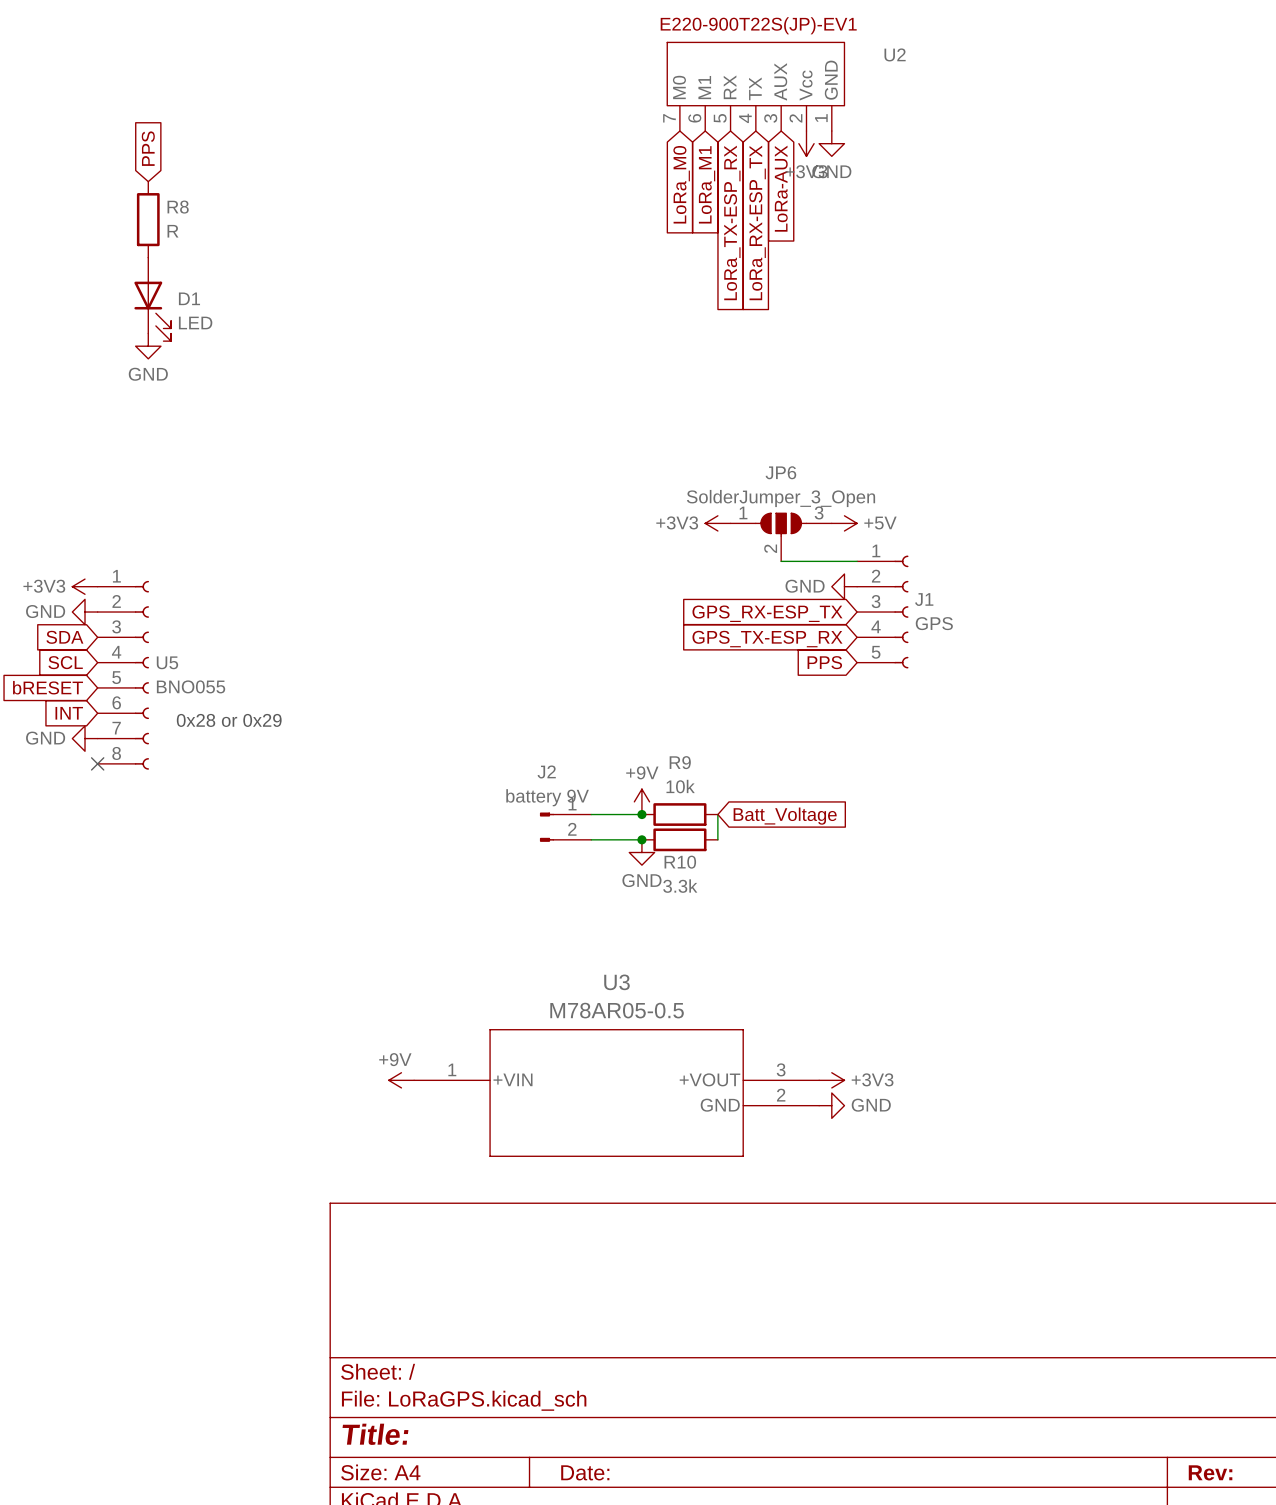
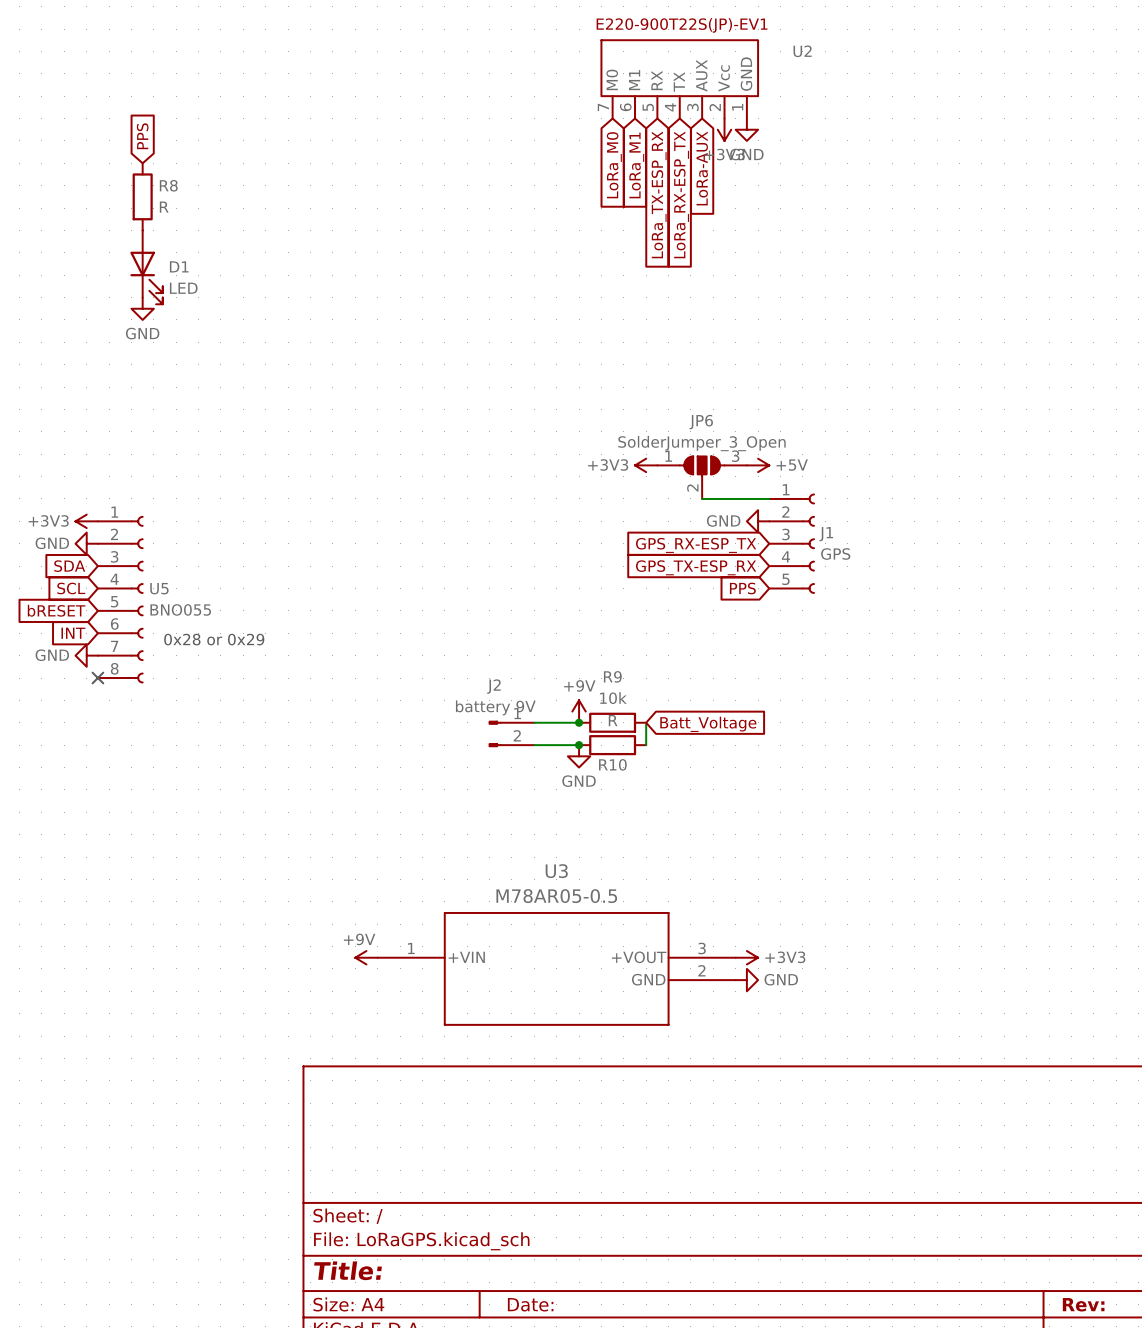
R10 value: 3.3k (680, 886) -> R (613, 720)

